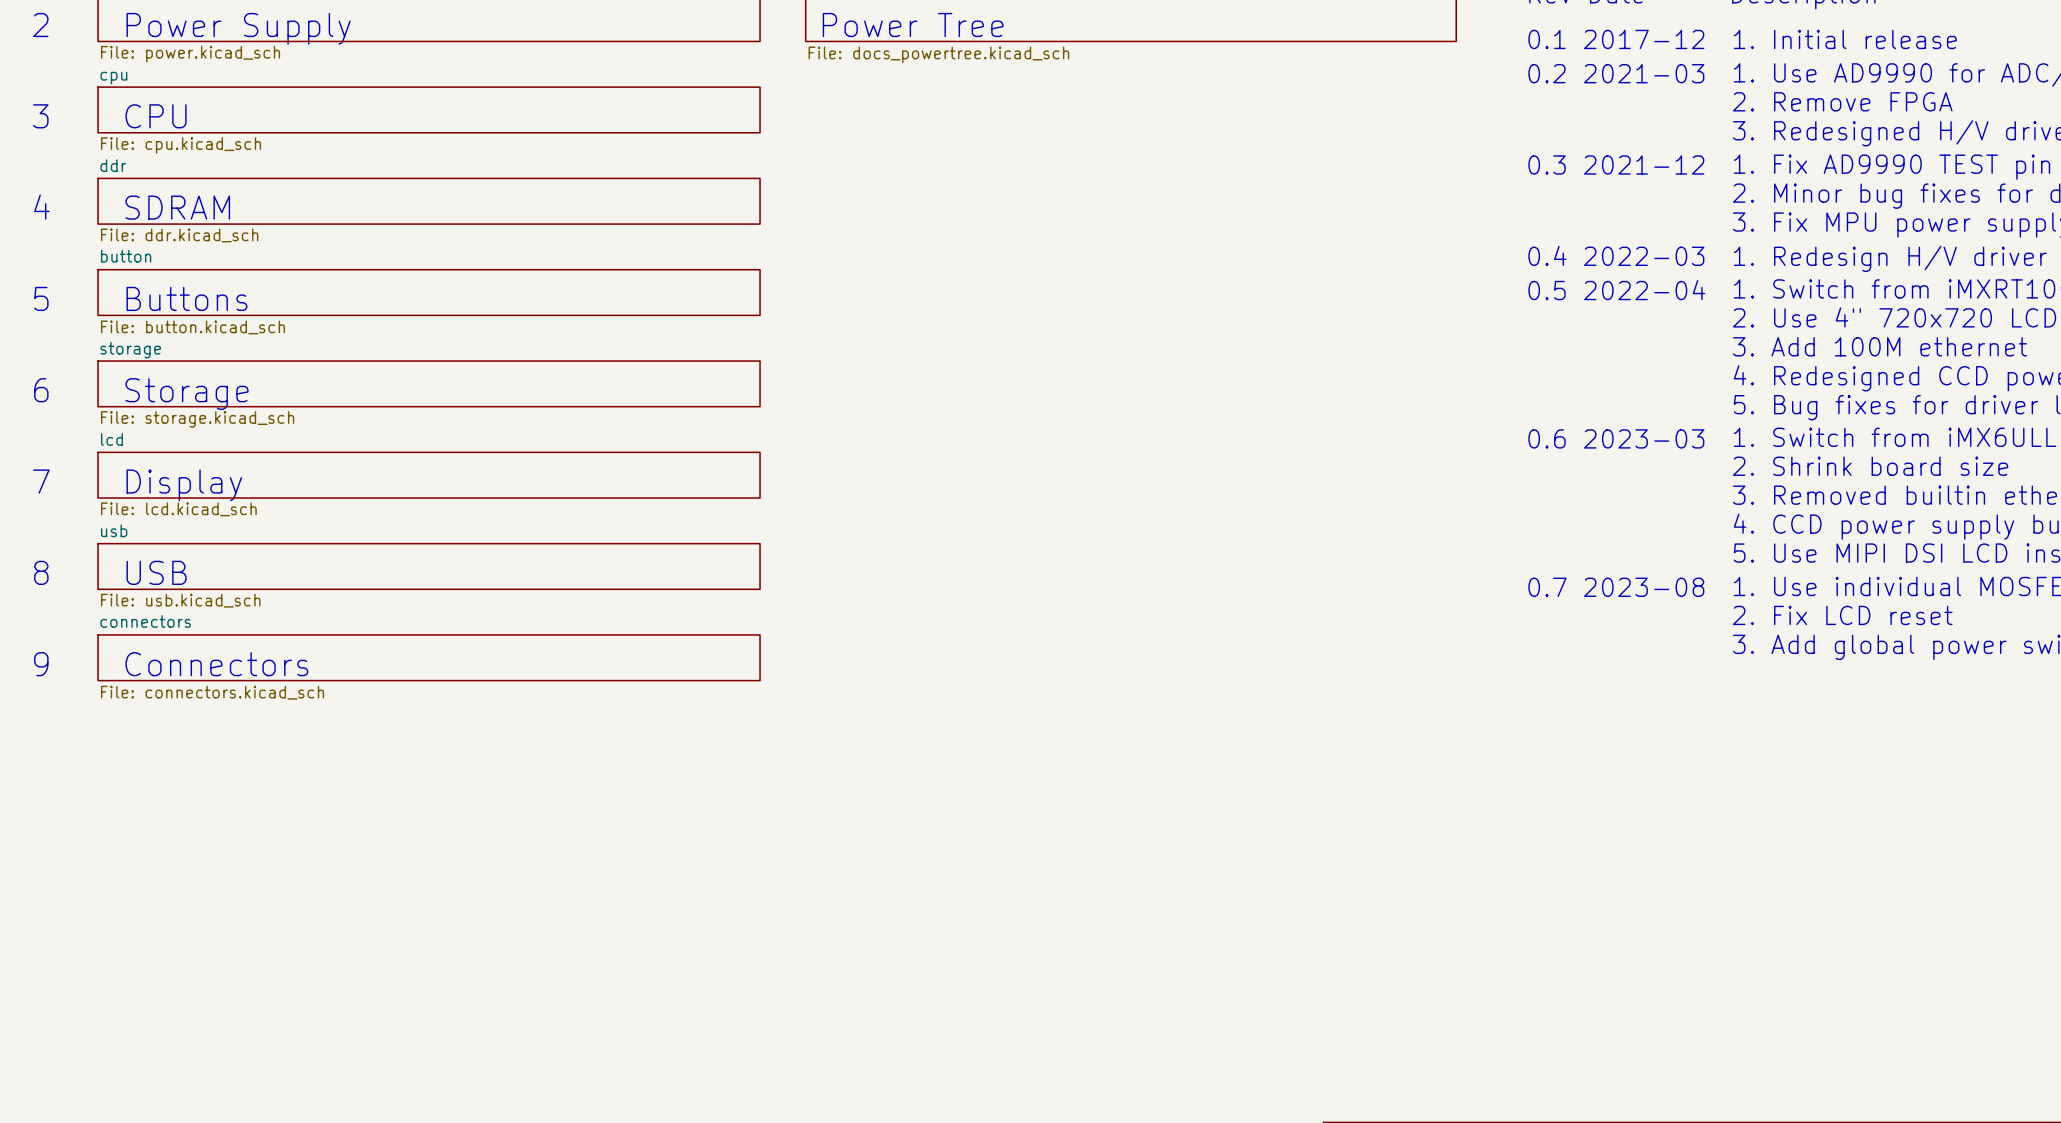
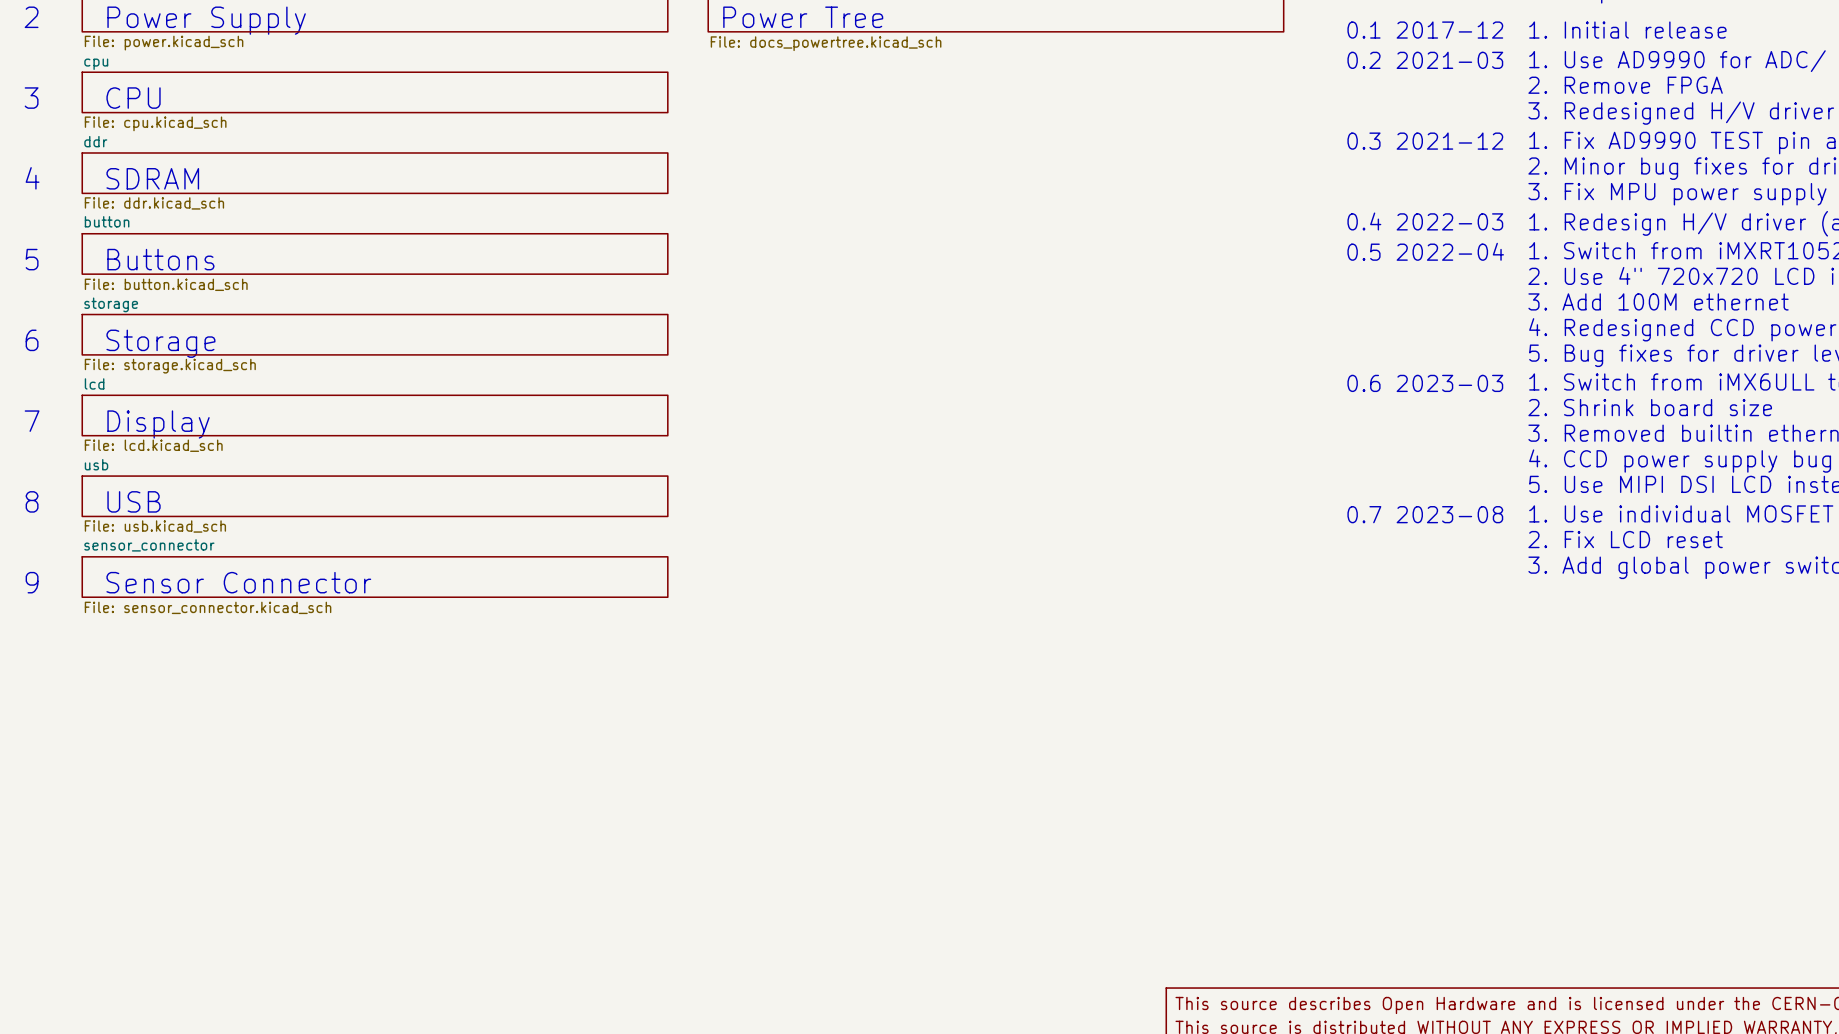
sheet connectors name: connectors (145, 621) -> sensor_connector (149, 545)
text: Connectors (216, 664) -> Sensor Connector (238, 582)
sheet connectors value: File: connectors.kicad_sch (212, 692) -> File: sensor_connector.kicad_sch (208, 607)

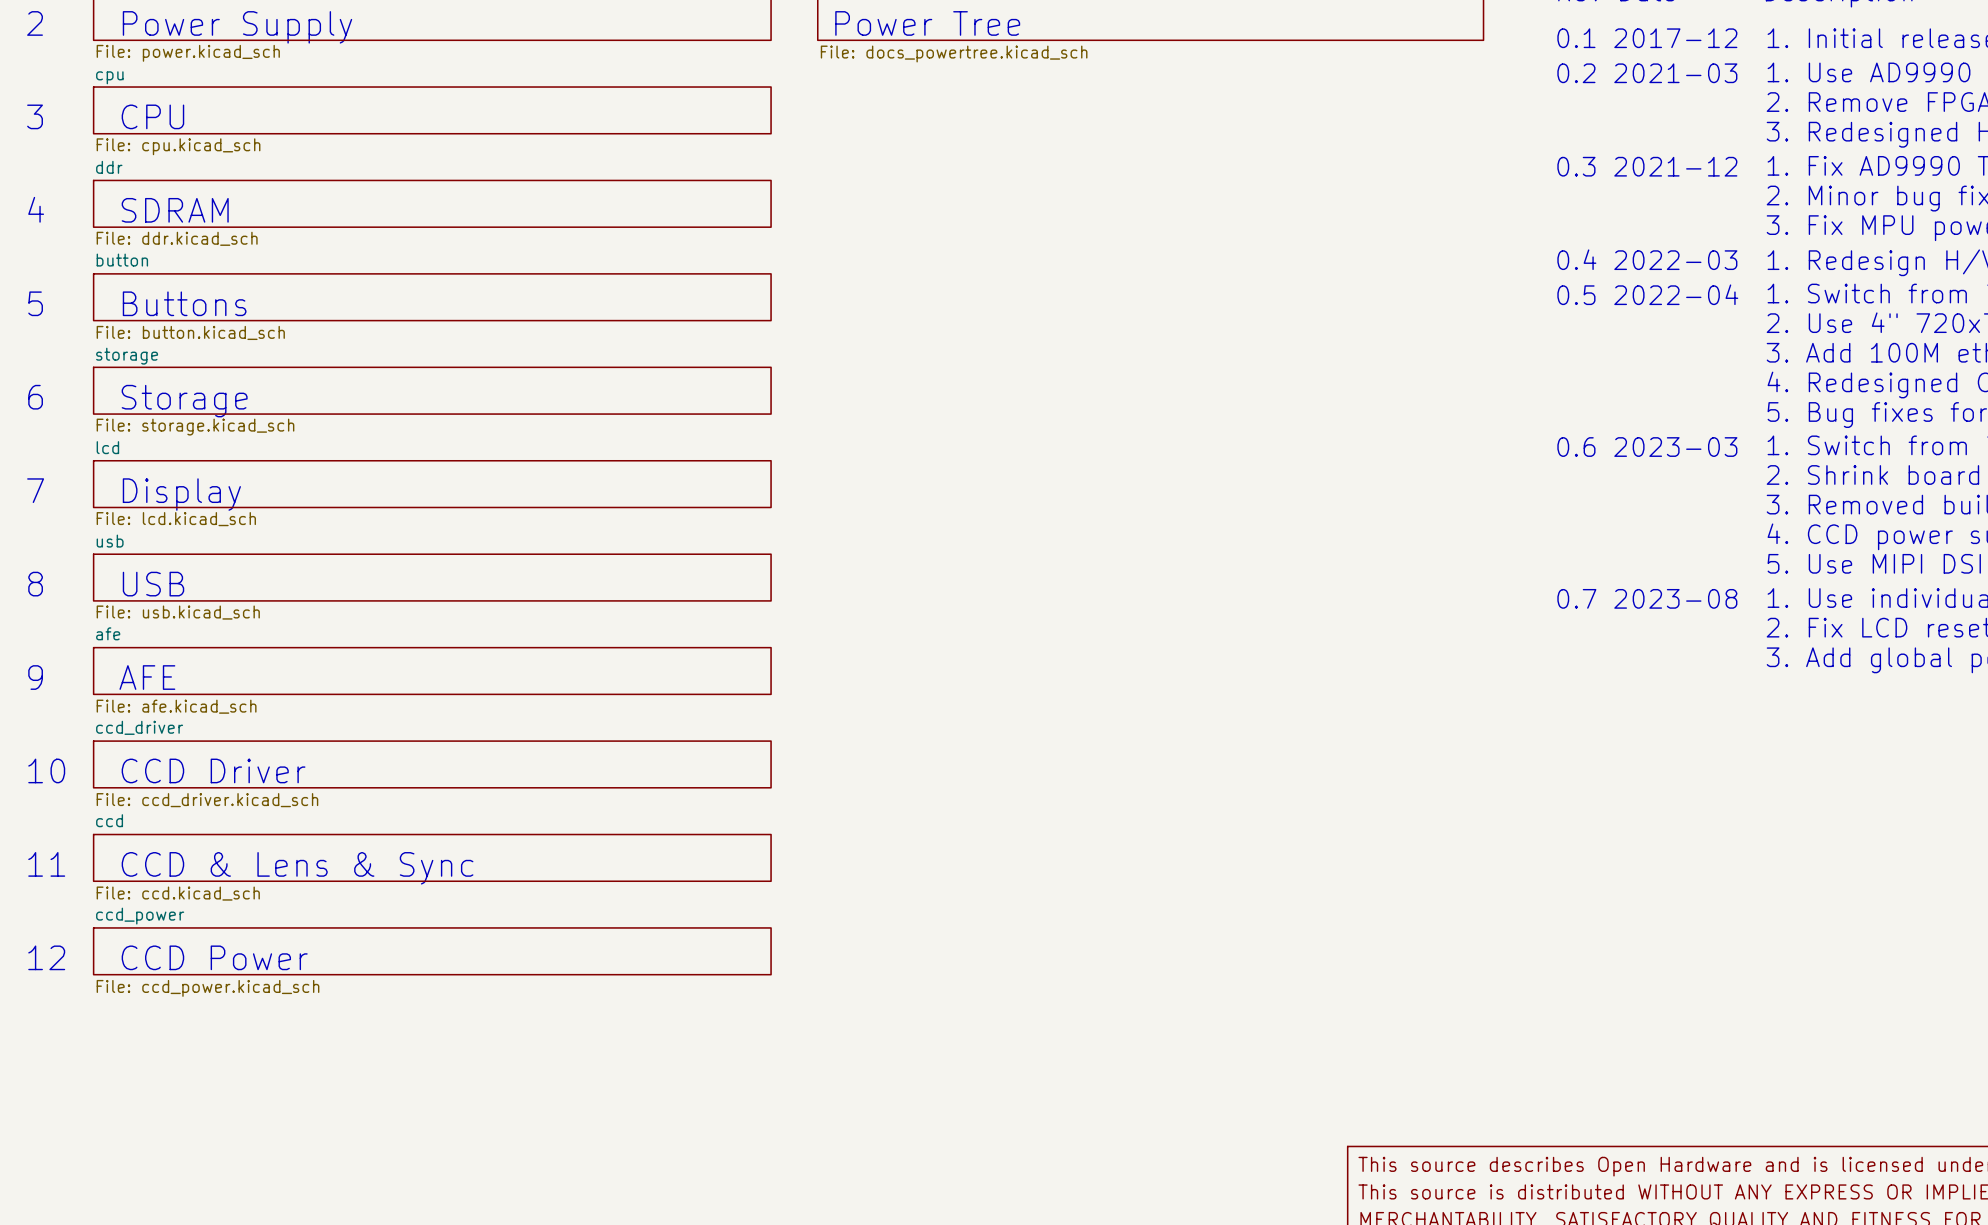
sheet sensor_connector name: sensor_connector (149, 545) -> afe (108, 633)
text: Sensor Connector (238, 582) -> AFE (147, 677)
sheet sensor_connector value: File: sensor_connector.kicad_sch (208, 607) -> File: afe.kicad_sch (176, 706)
sheet ccd_driver: none -> File: ccd_driver.kicad_sch (432, 764)
text: none -> 10 (46, 770)
text: none -> CCD Driver (213, 770)
sheet ccd: none -> File: ccd.kicad_sch (432, 857)
text: none -> 11 (46, 864)
text: none -> CCD & Lens & Sync (297, 868)
sheet ccd_power: none -> File: ccd_power.kicad_sch (432, 951)
text: none -> 12 (46, 957)
text: none -> CCD Power (214, 957)

